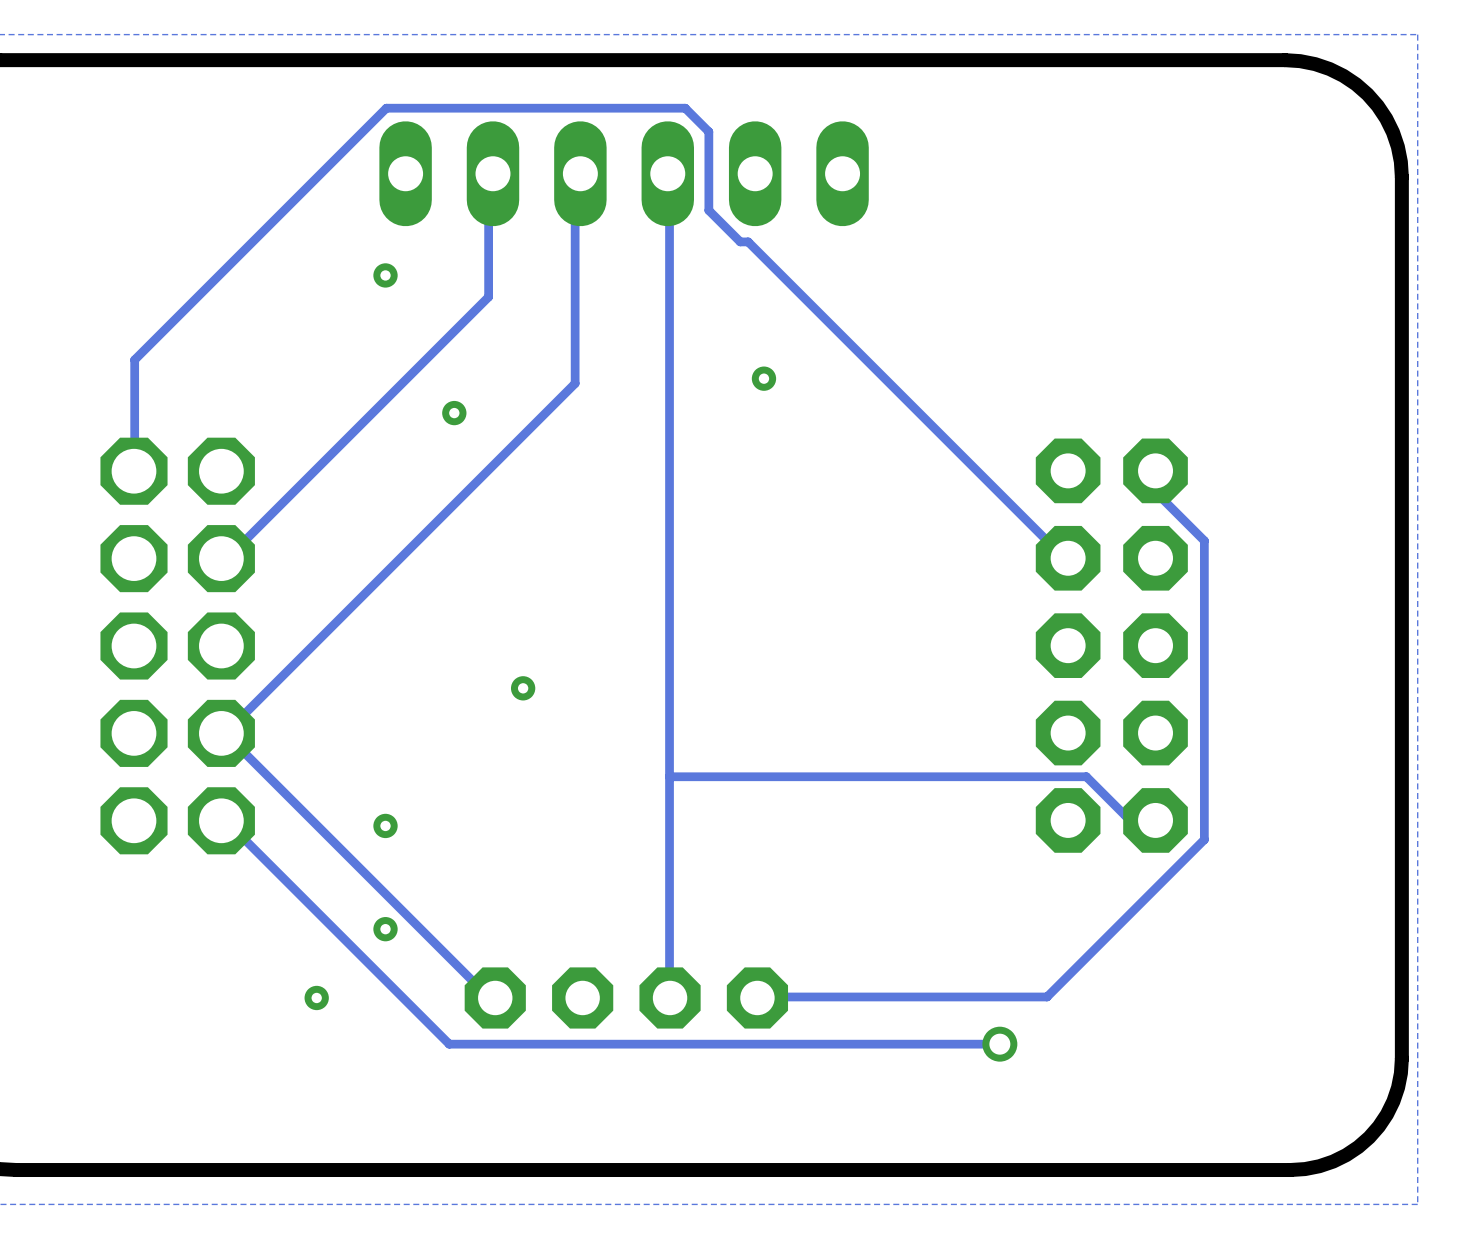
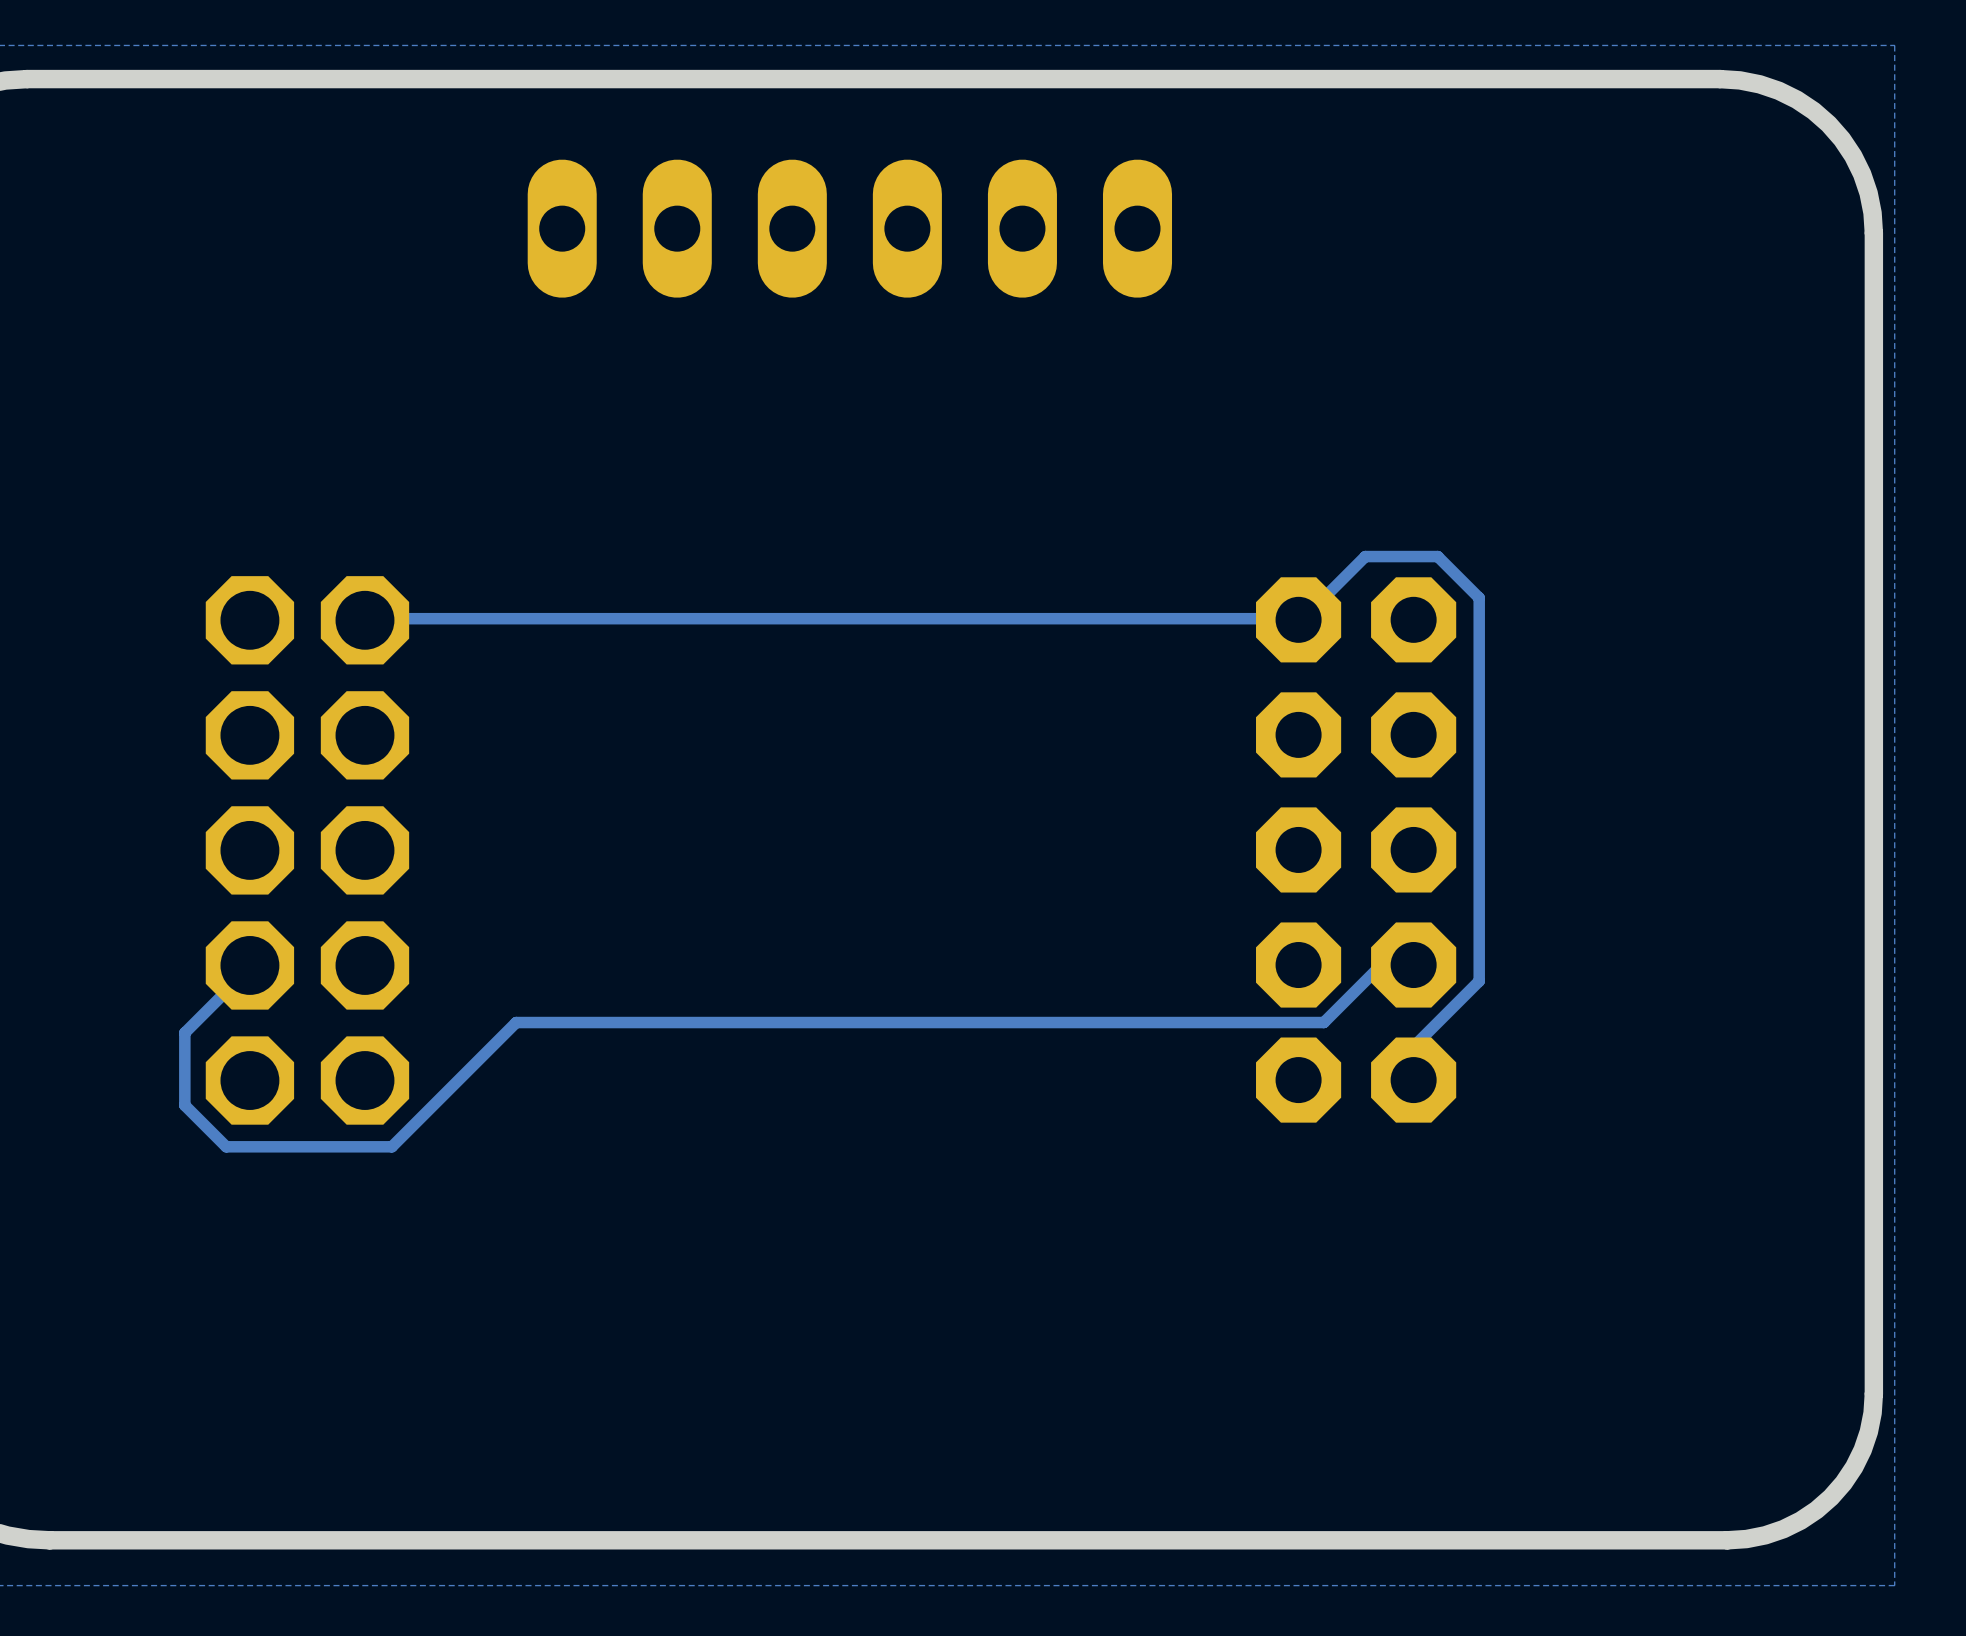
track: (492, 173) (488, 178) (488, 296) (229, 556) (221, 558) -> none
track: (580, 173) (575, 178) (575, 383) (229, 729) (221, 733) (229, 737) (488, 996) (495, 997) -> none
track: (667, 173) (669, 178) (670, 997) -> none
via: (385, 275) -> none
via: (763, 378) -> none
via: (454, 413) -> none
track: (1155, 470) (1157, 493) (1204, 540) (1204, 839) (1047, 996) (757, 997) -> none
track: (133, 471) (134, 359) (386, 108) (685, 108) (708, 131) (708, 210) (740, 241) (748, 241) (1062, 556) (1068, 558) -> none
track: none -> (364, 620) (371, 618) (1298, 619) (1303, 618) (1365, 556) (1437, 556) (1479, 597) (1479, 981) (1417, 1043) (1417, 1074) (1413, 1080)
part position: (1111, 645) -> (1356, 849)
part position: (177, 646) -> (307, 850)
via: (523, 688) -> none
track: none -> (249, 965) (246, 970) (184, 1032) (184, 1105) (226, 1146) (391, 1146) (516, 1022) (909, 1022)
track: (984, 776) (1086, 776) (1125, 816) (1149, 816) (1155, 820) -> (1323, 1022) (1375, 970) (1406, 970) (1413, 965)
track: (221, 820) (229, 823) (449, 1044) (999, 1044) -> none
via: (385, 825) -> none
via: (385, 929) -> none
via: (316, 997) -> none
part: (626, 997) -> none
via: (999, 1044) -> none

